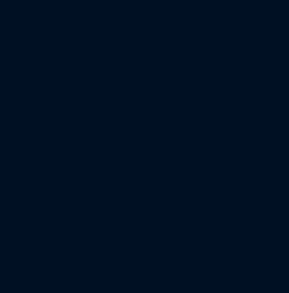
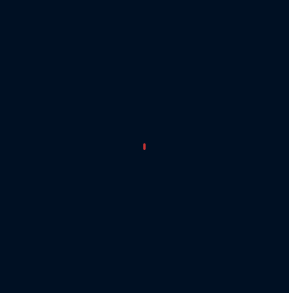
track: none -> (144, 144) (144, 148)

